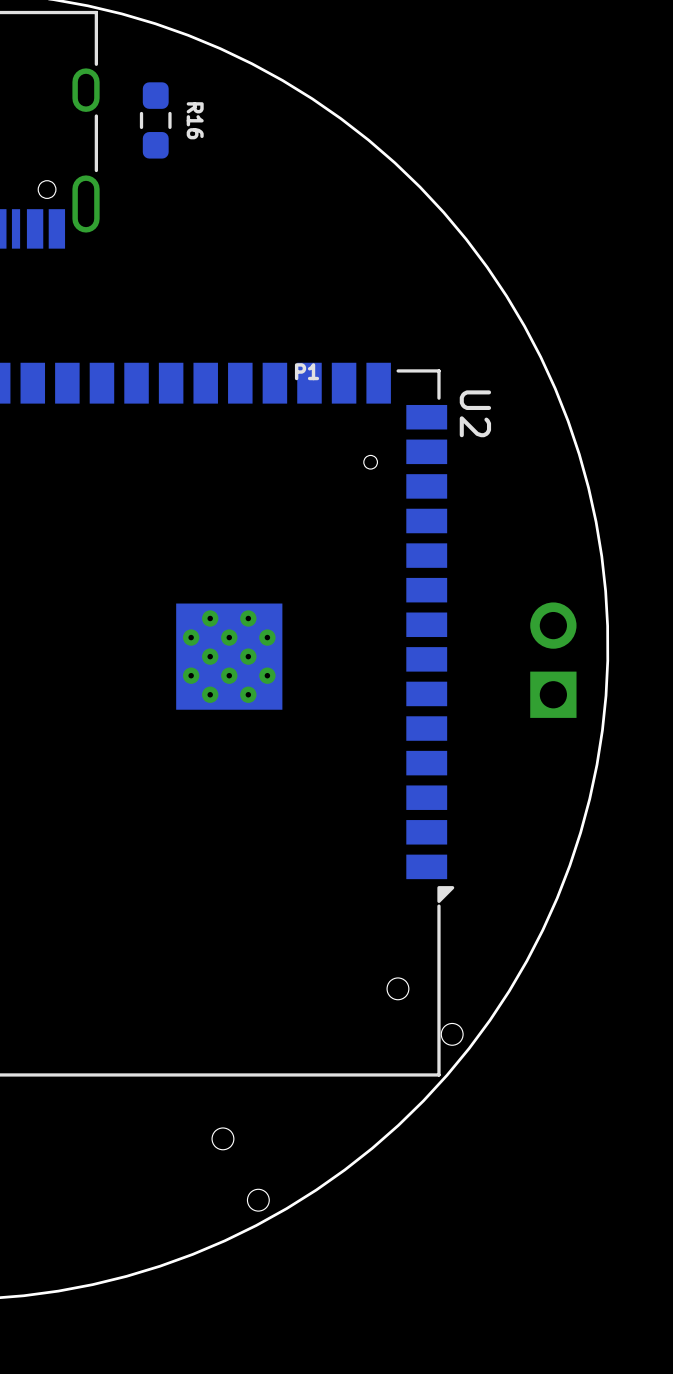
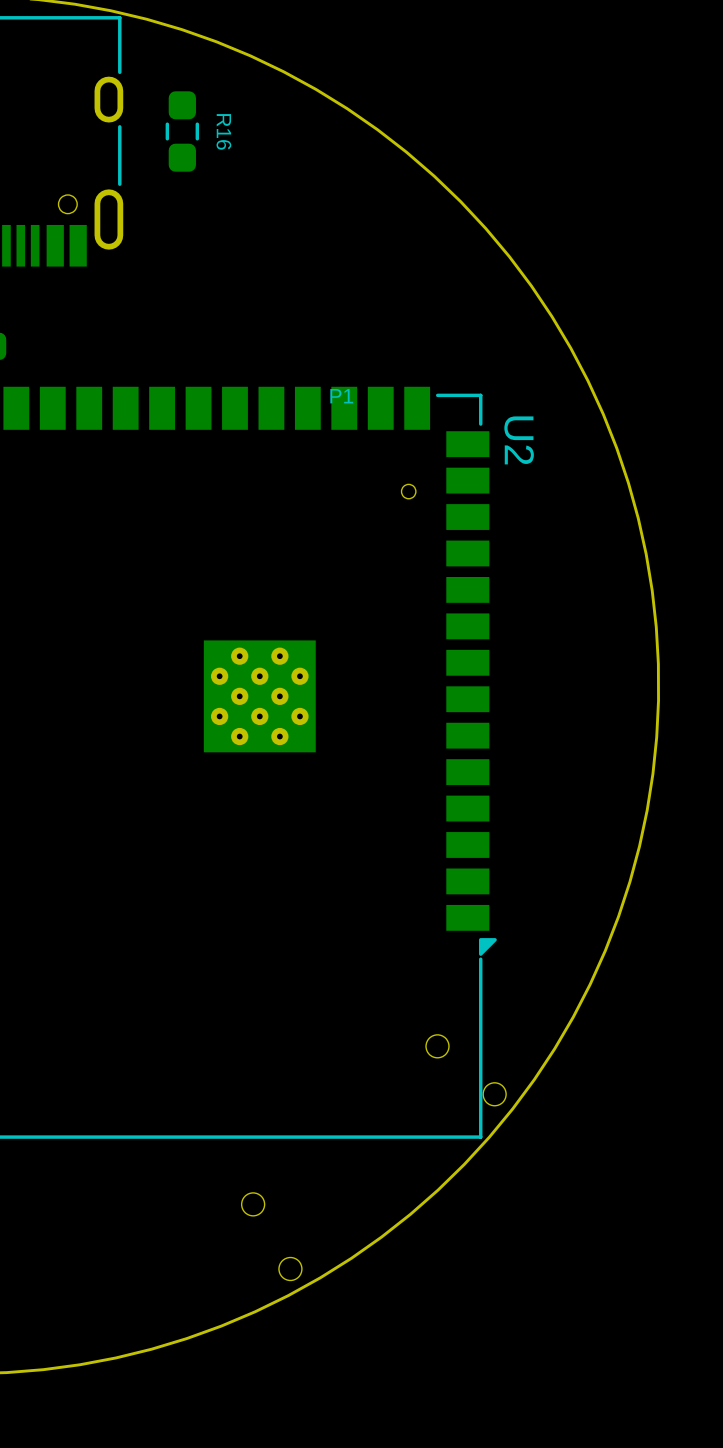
part: (553, 660) -> none

